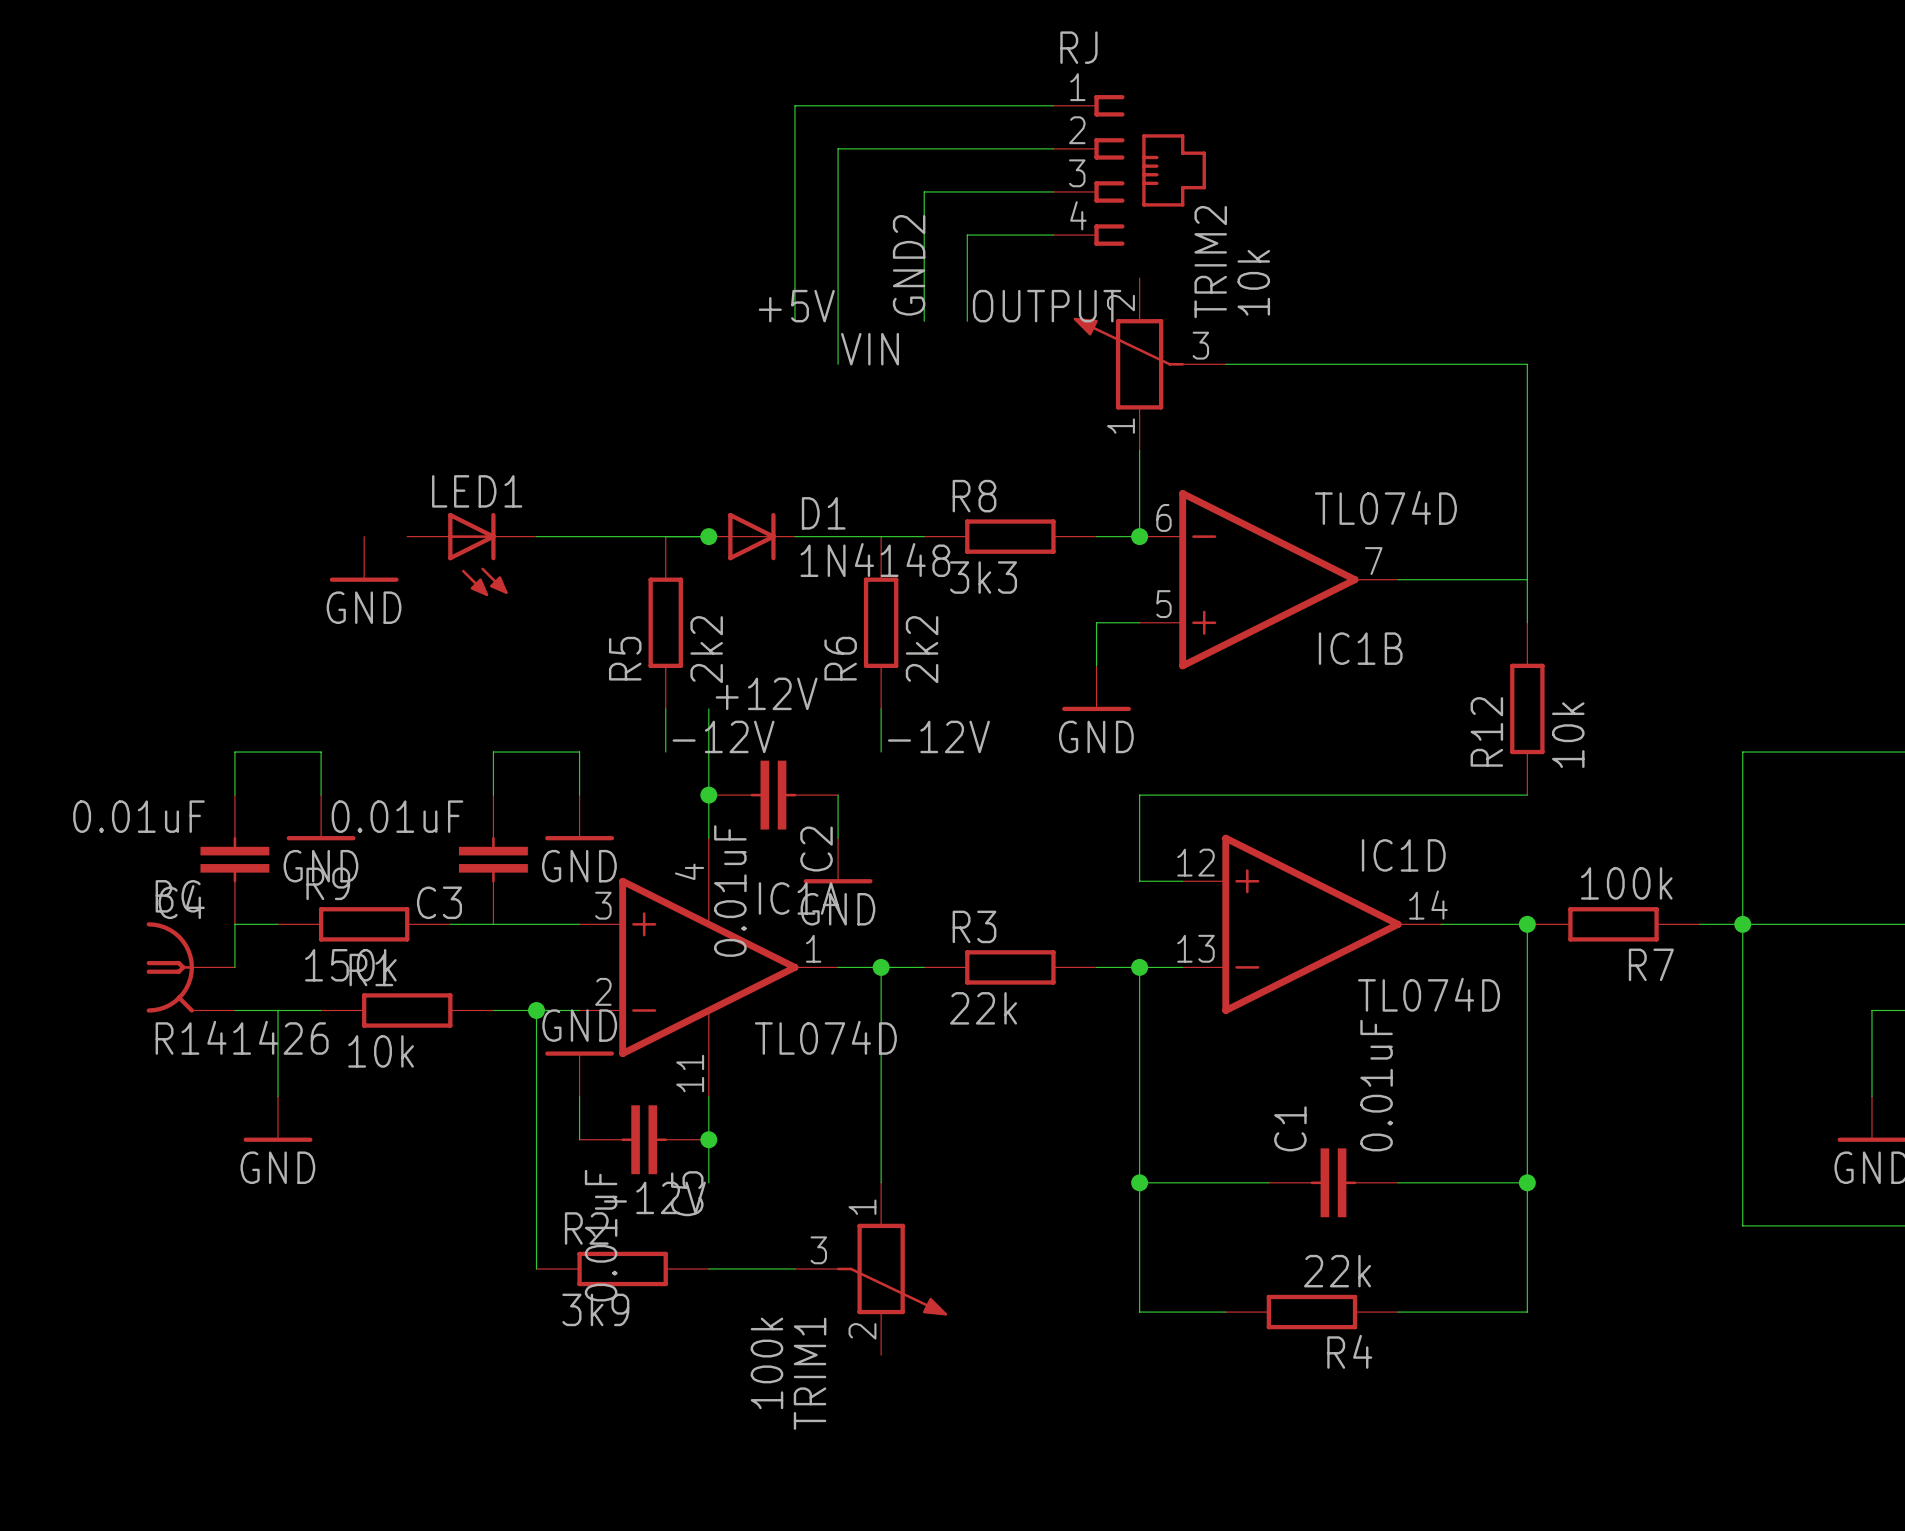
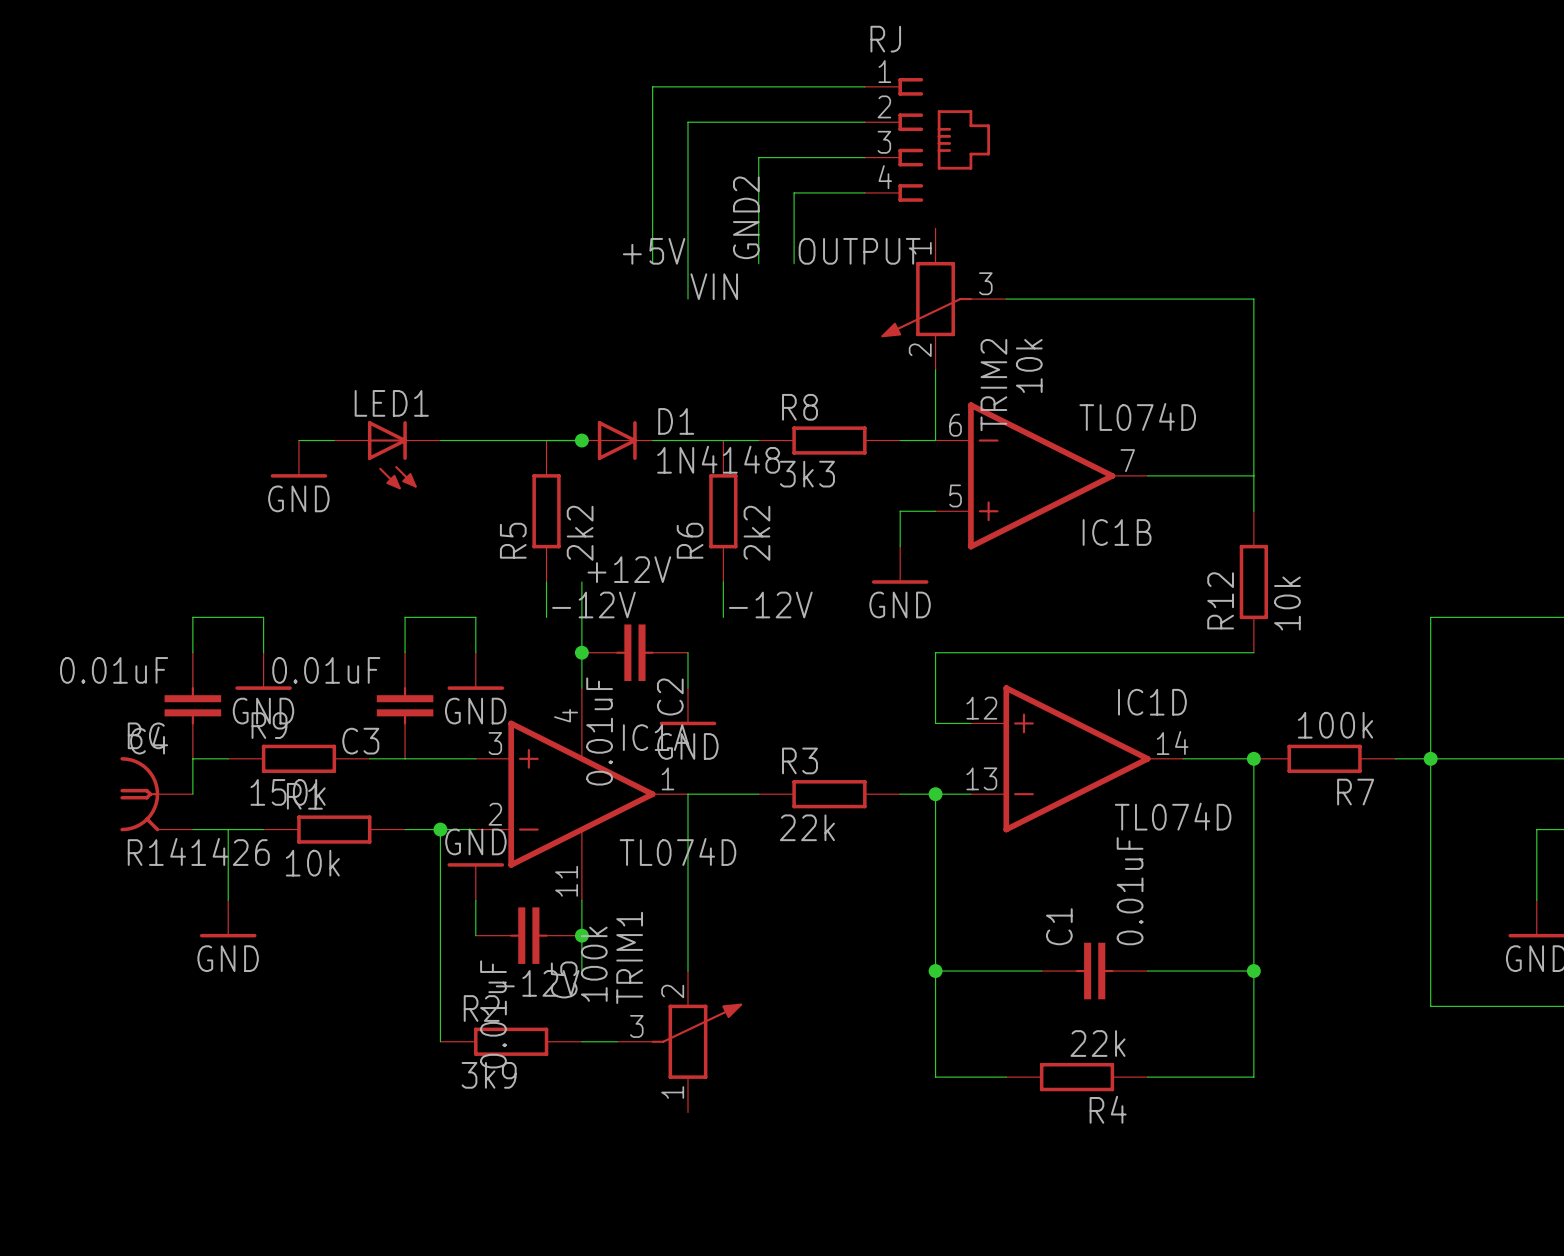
TRIM2 flip: as is (1128, 363) -> up-down (926, 299)
wire: none -> (298, 440) (334, 440)
junction: (1139, 536) -> none
wire: (881, 967) (881, 1182) -> (687, 794) (687, 971)
junction: (881, 967) -> none
TRIM1 flip: as is (891, 1269) -> up-down (696, 1041)

